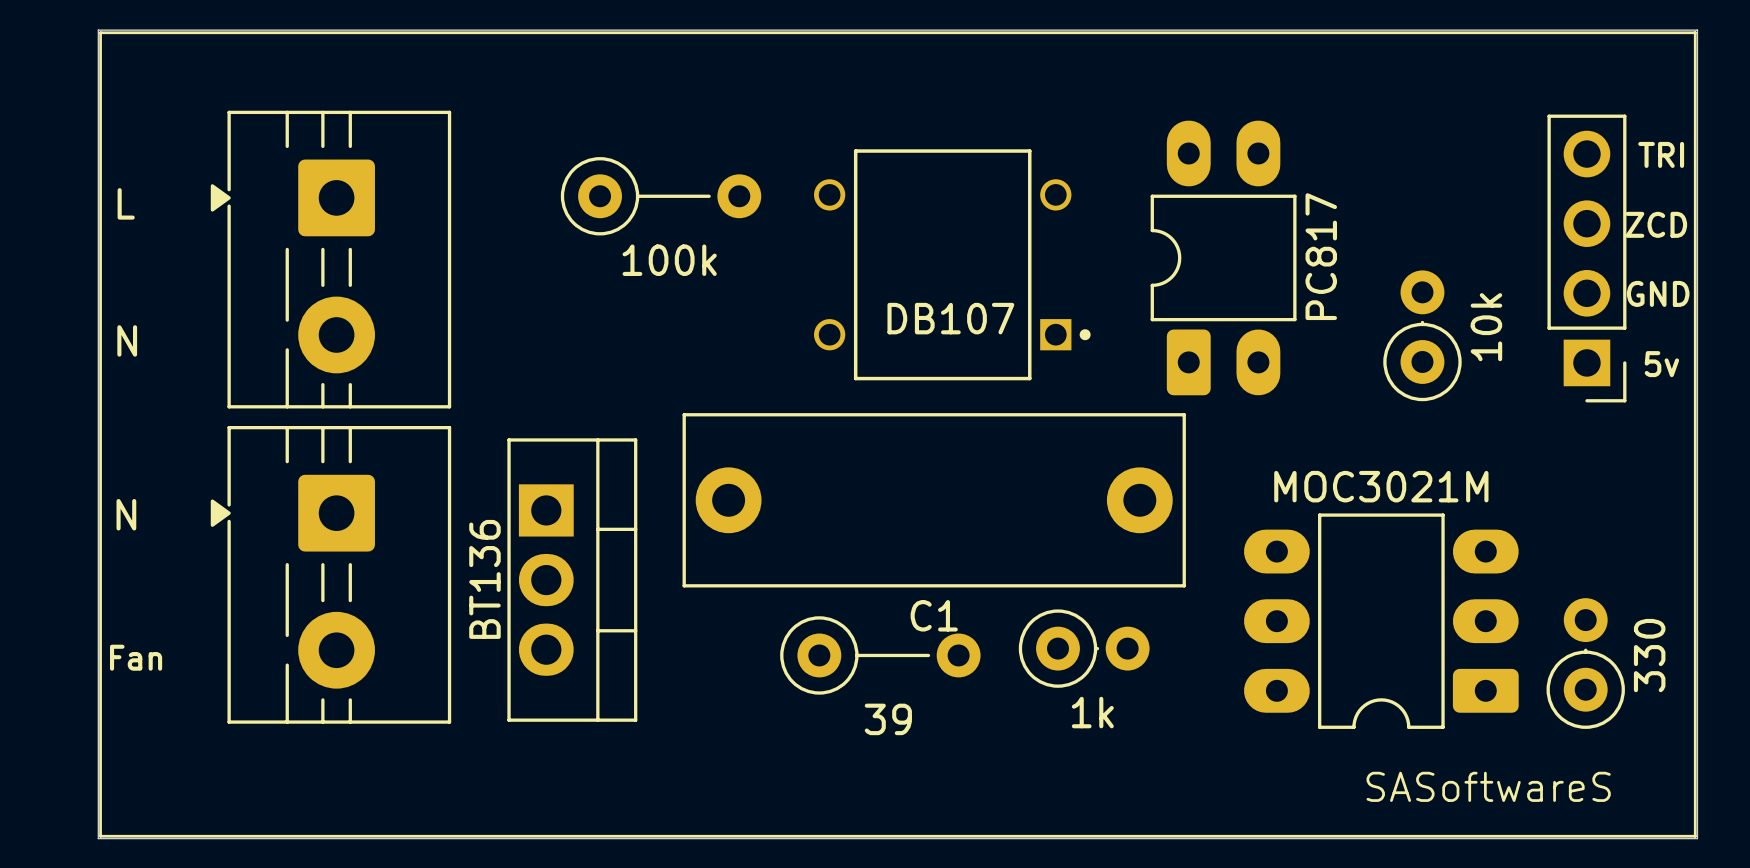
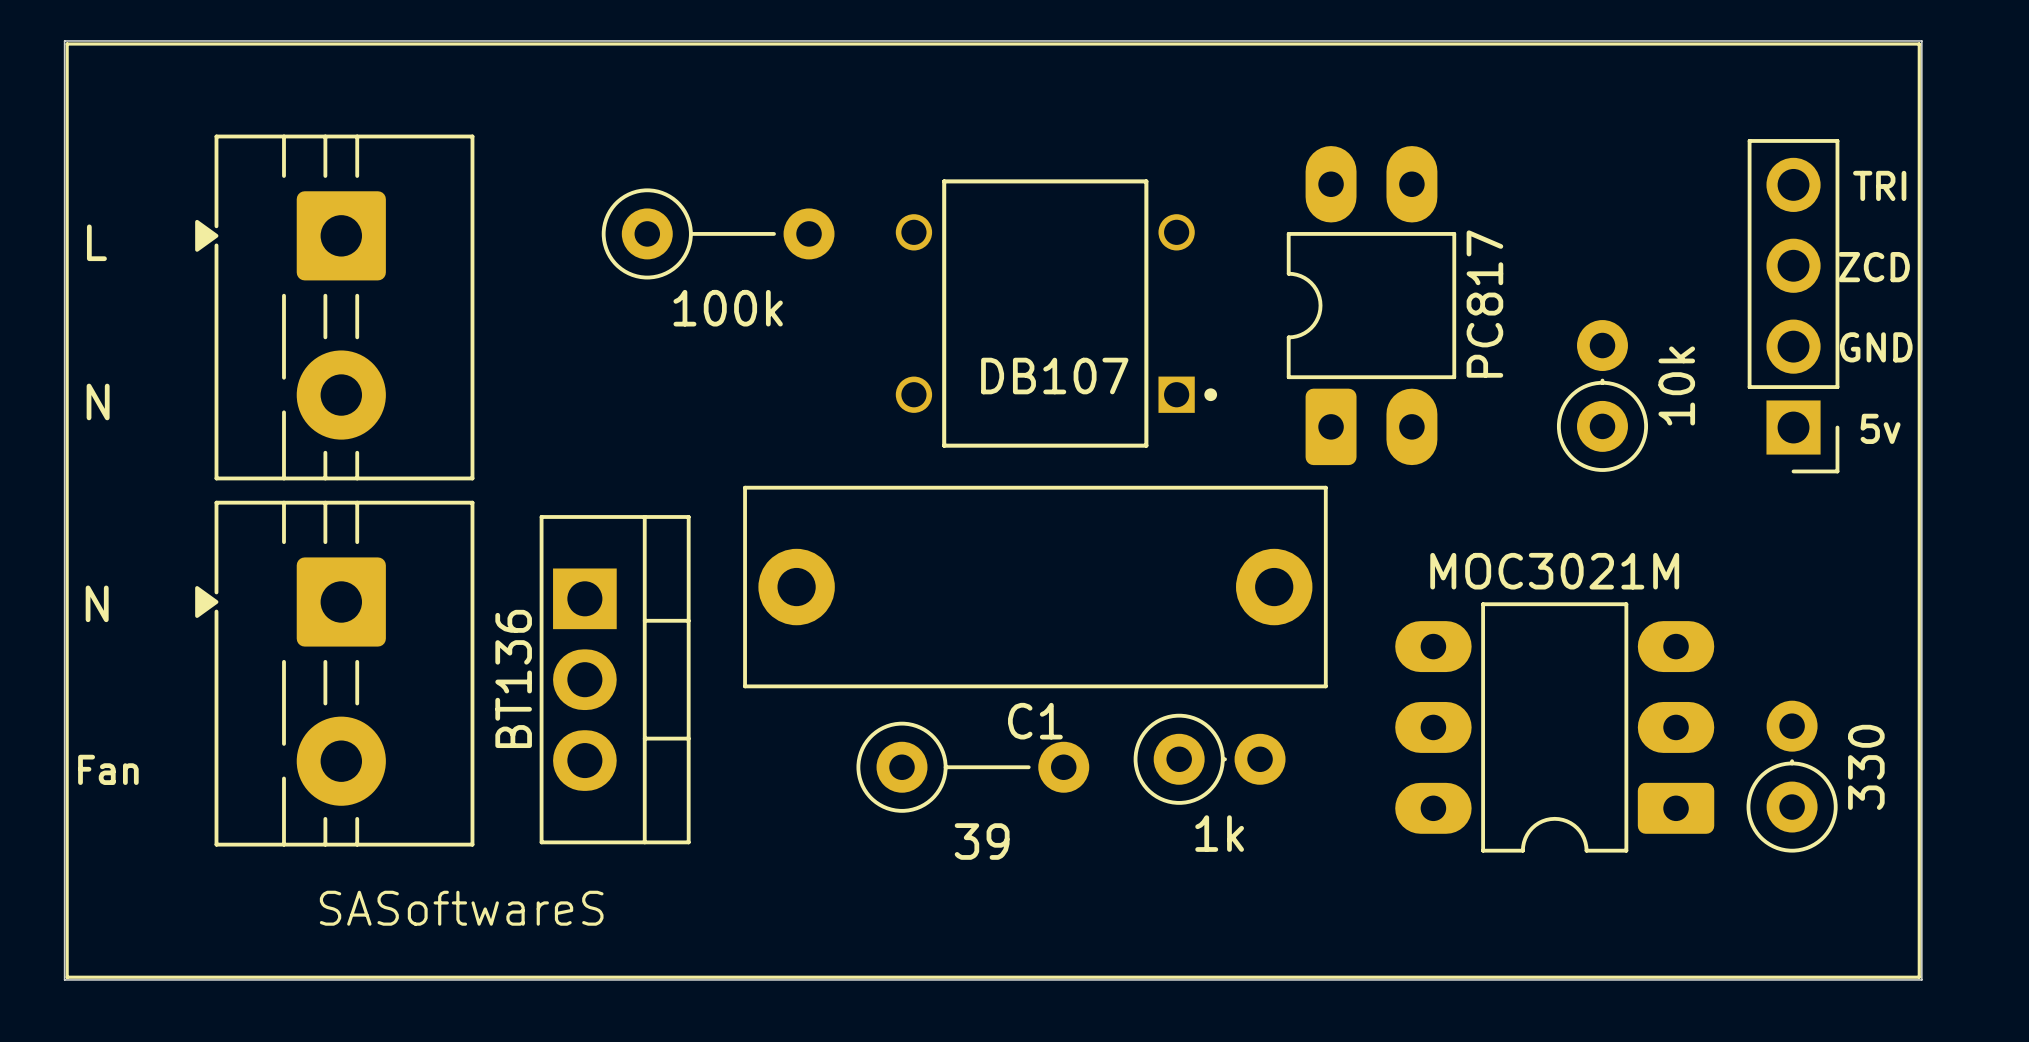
text: none -> SASoftwareS (461, 908)
text: SASoftwareS (1488, 786) -> none

